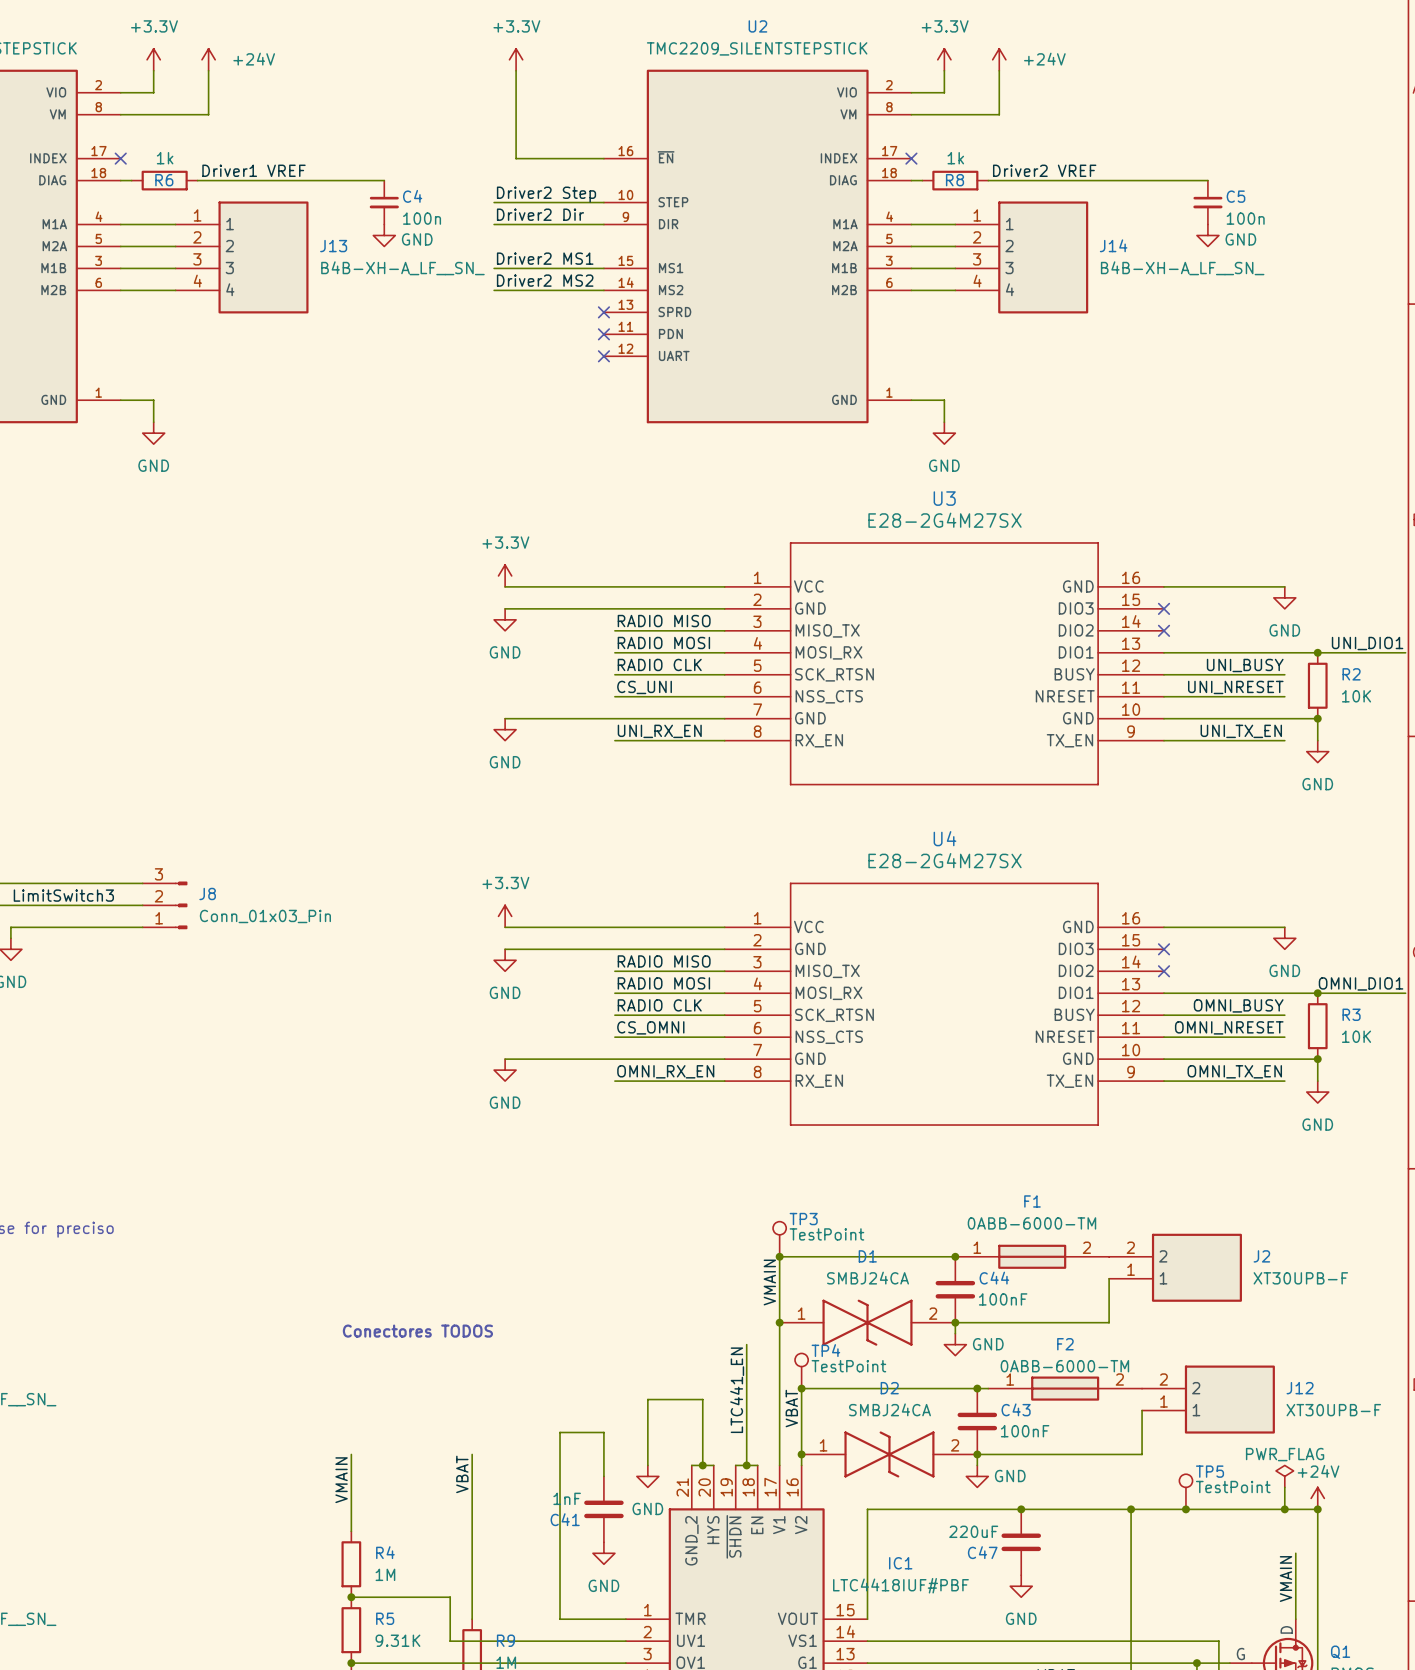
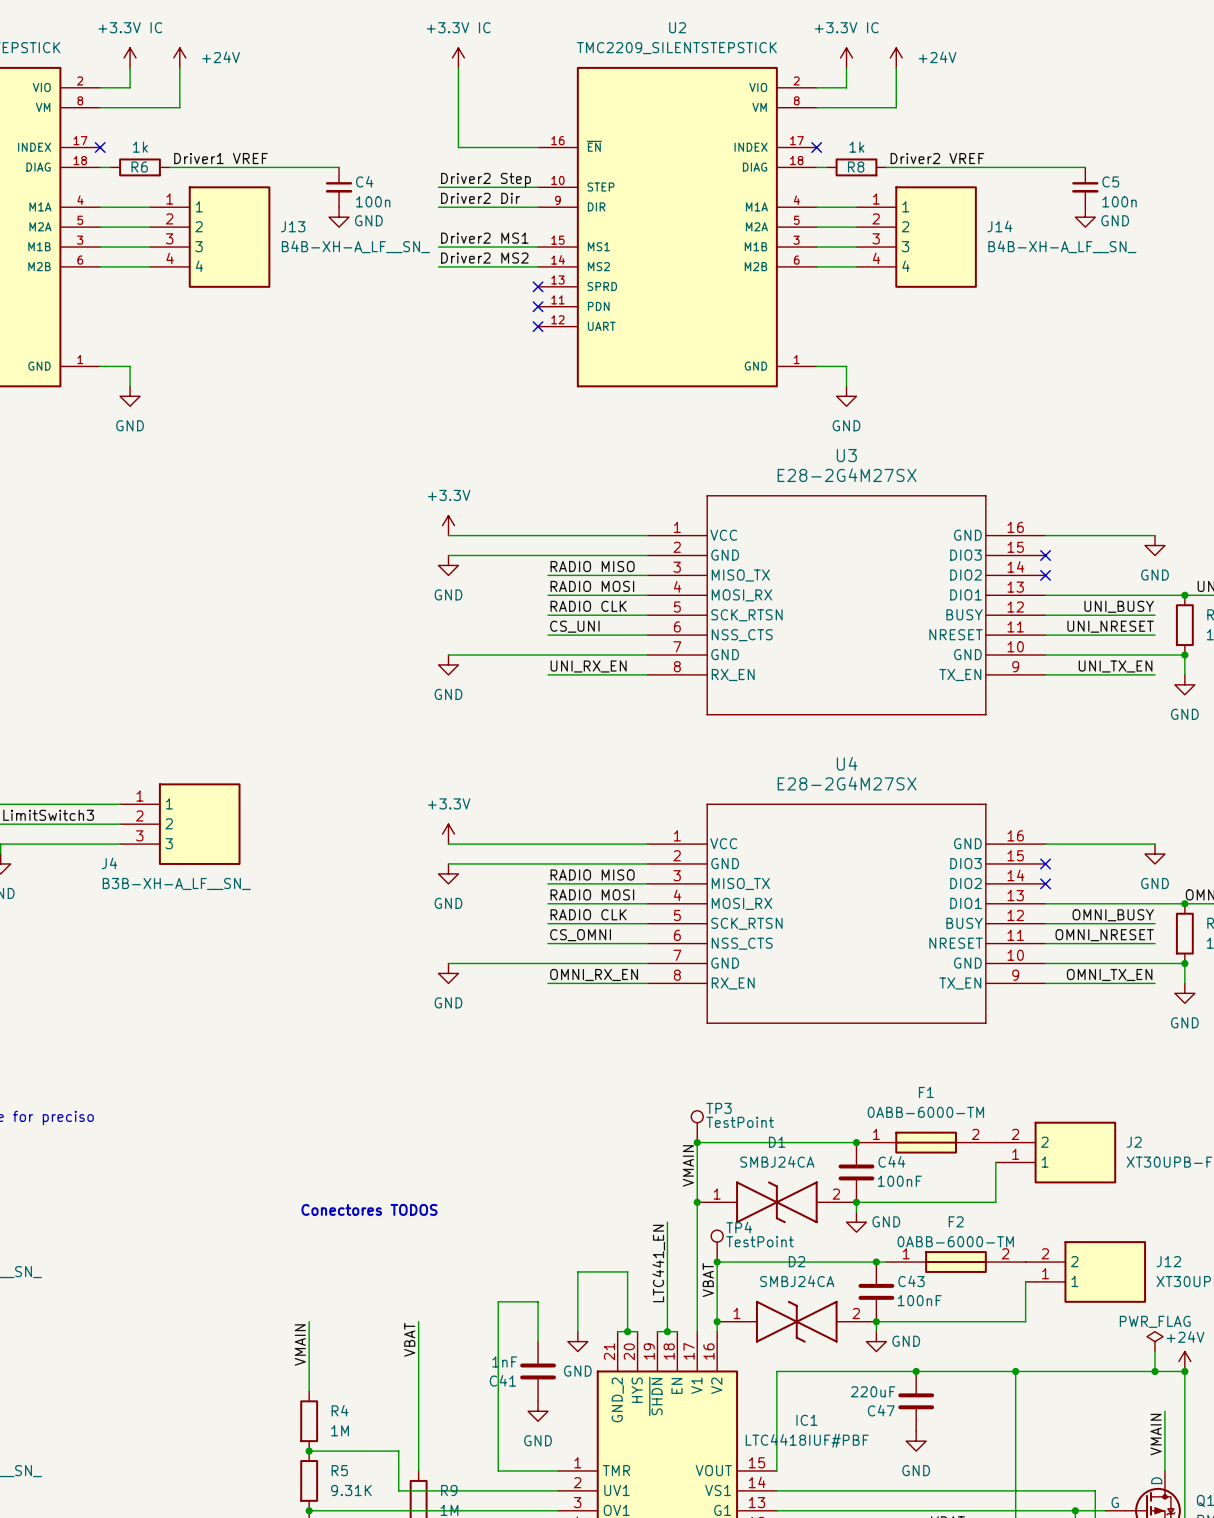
power symbol: +3.3V (153, 59) -> +3.3V IC (130, 57)
power symbol: +3.3V (516, 59) -> +3.3V IC (458, 57)
power symbol: +3.3V (944, 59) -> +3.3V IC (846, 57)
J8: Conn_01x03_Pin (164, 905) -> none
J4: none -> B3B-XH-A_LF__SN_ (180, 824)
TP5: TestPoint (1185, 1491) -> none
junction: (1185, 1509) -> none

